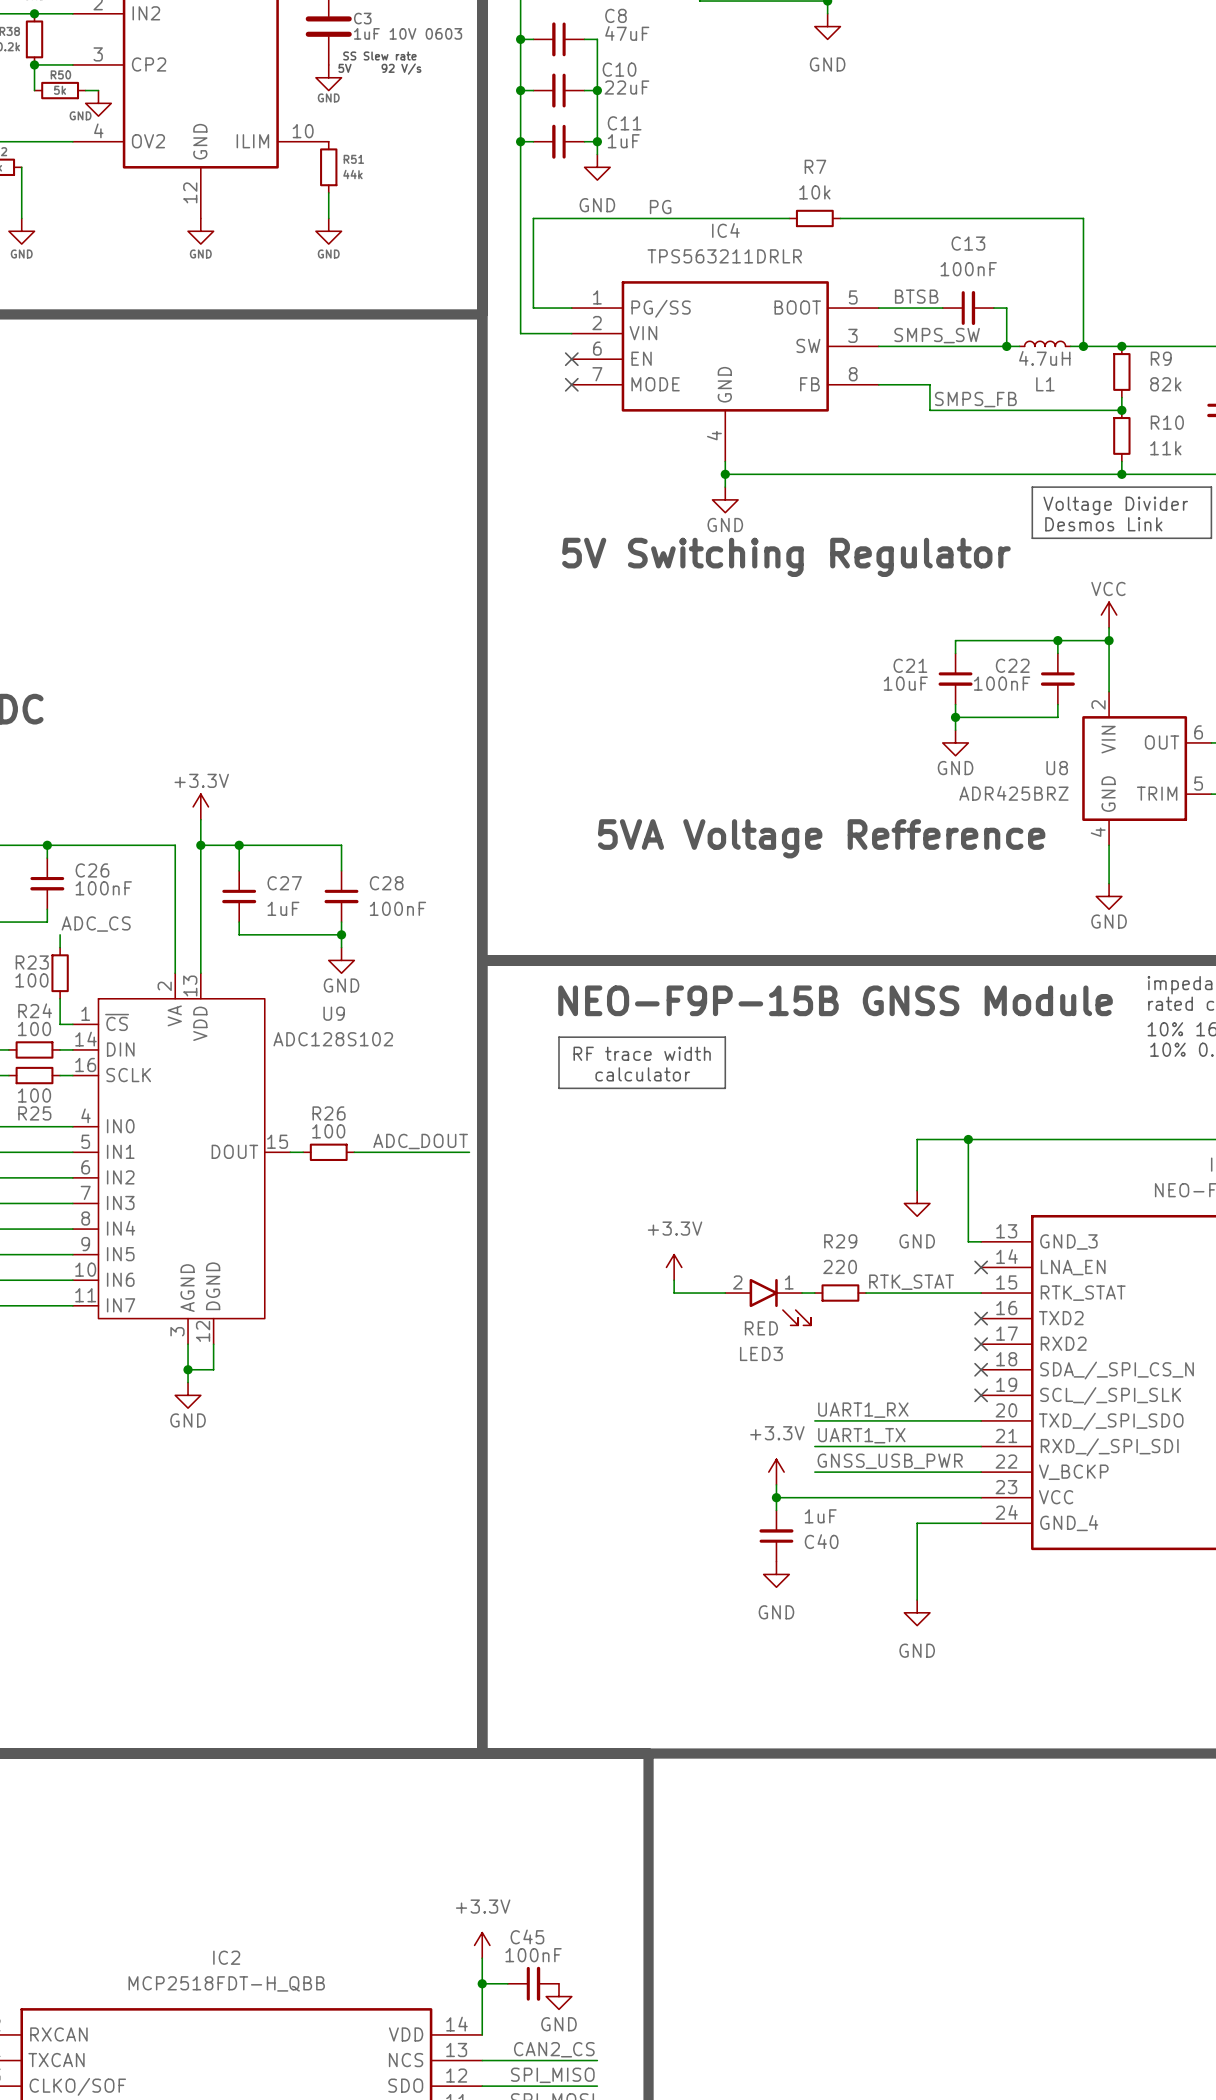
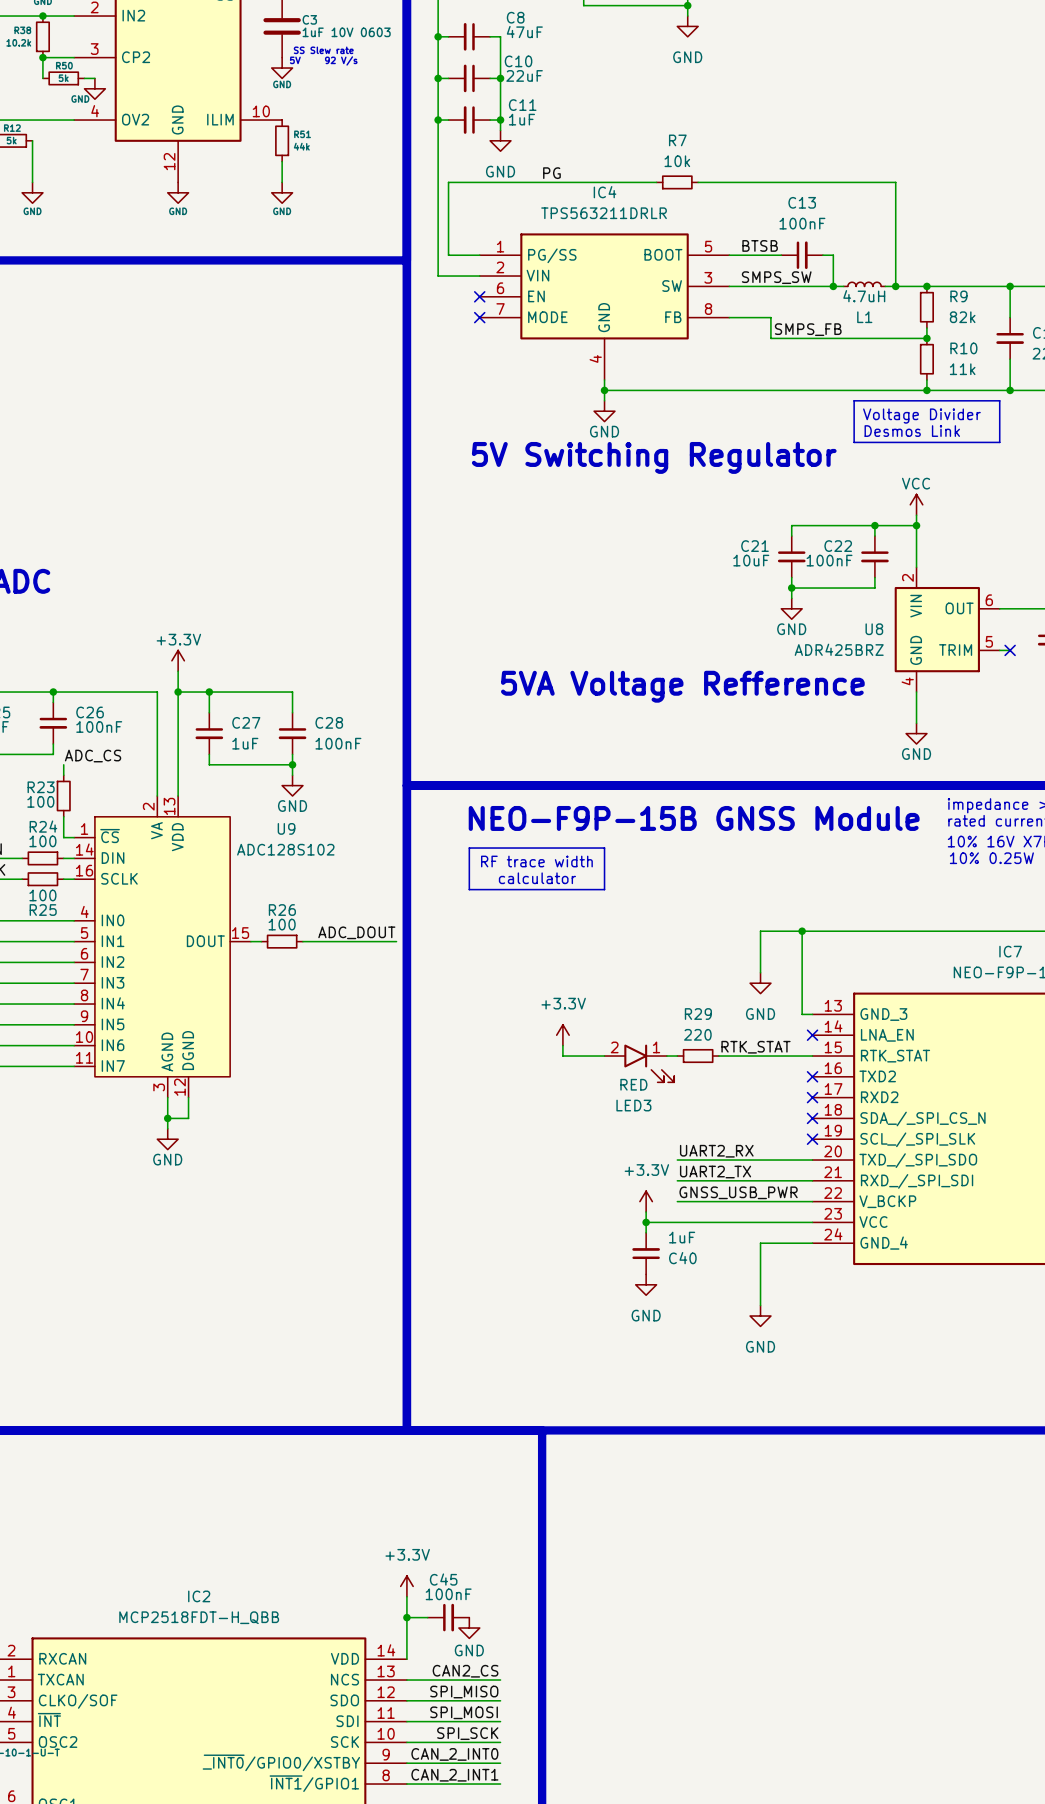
label: UART1_RX (863, 1410) -> UART2_RX (716, 1151)
label: UART1_TX (861, 1435) -> UART2_TX (715, 1172)

